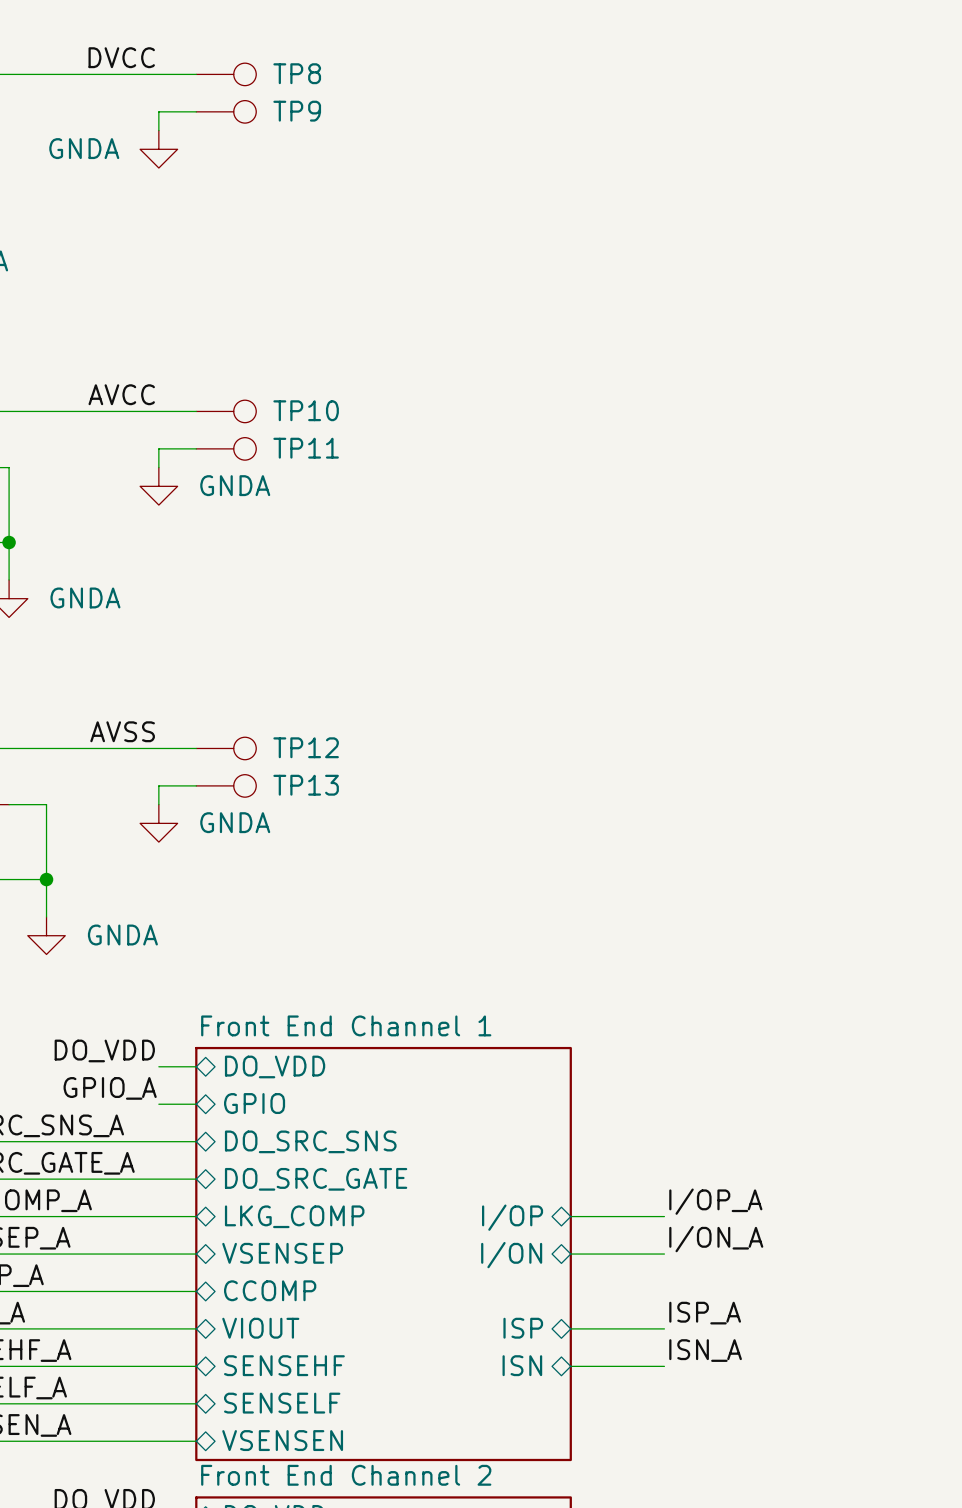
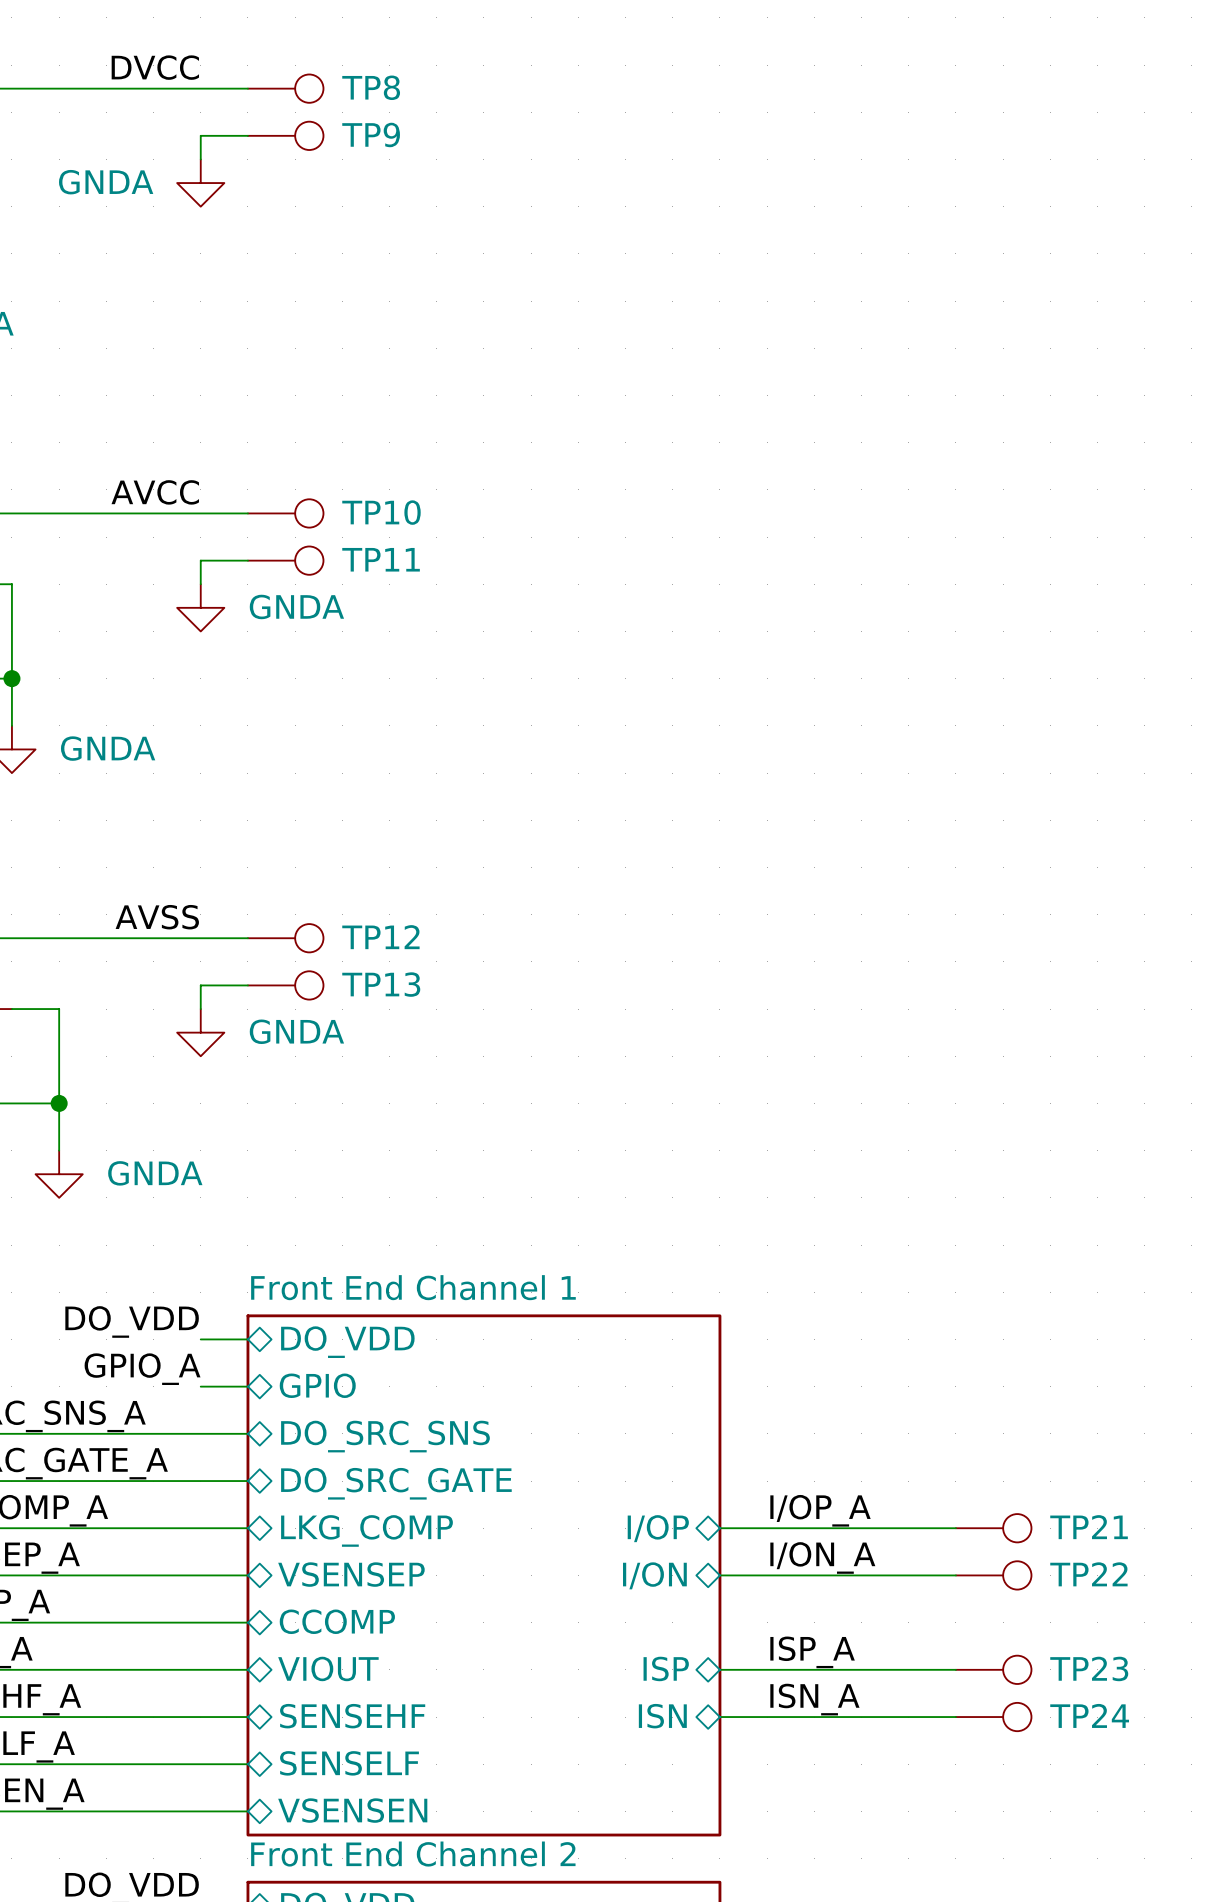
label position: I/OP_A (715, 1201) -> I/OP_A (820, 1510)
wire: none -> (837, 1528) (955, 1528)
TP21: none -> (993, 1528)
label position: I/ON_A (716, 1239) -> I/ON_A (822, 1557)
wire: none -> (837, 1575) (955, 1575)
TP22: none -> (993, 1575)
label position: ISP_A (705, 1313) -> ISP_A (812, 1652)
wire: none -> (837, 1669) (955, 1669)
TP23: none -> (993, 1669)
label position: ISN_A (705, 1350) -> ISN_A (814, 1699)
wire: none -> (837, 1717) (955, 1717)
TP24: none -> (993, 1717)

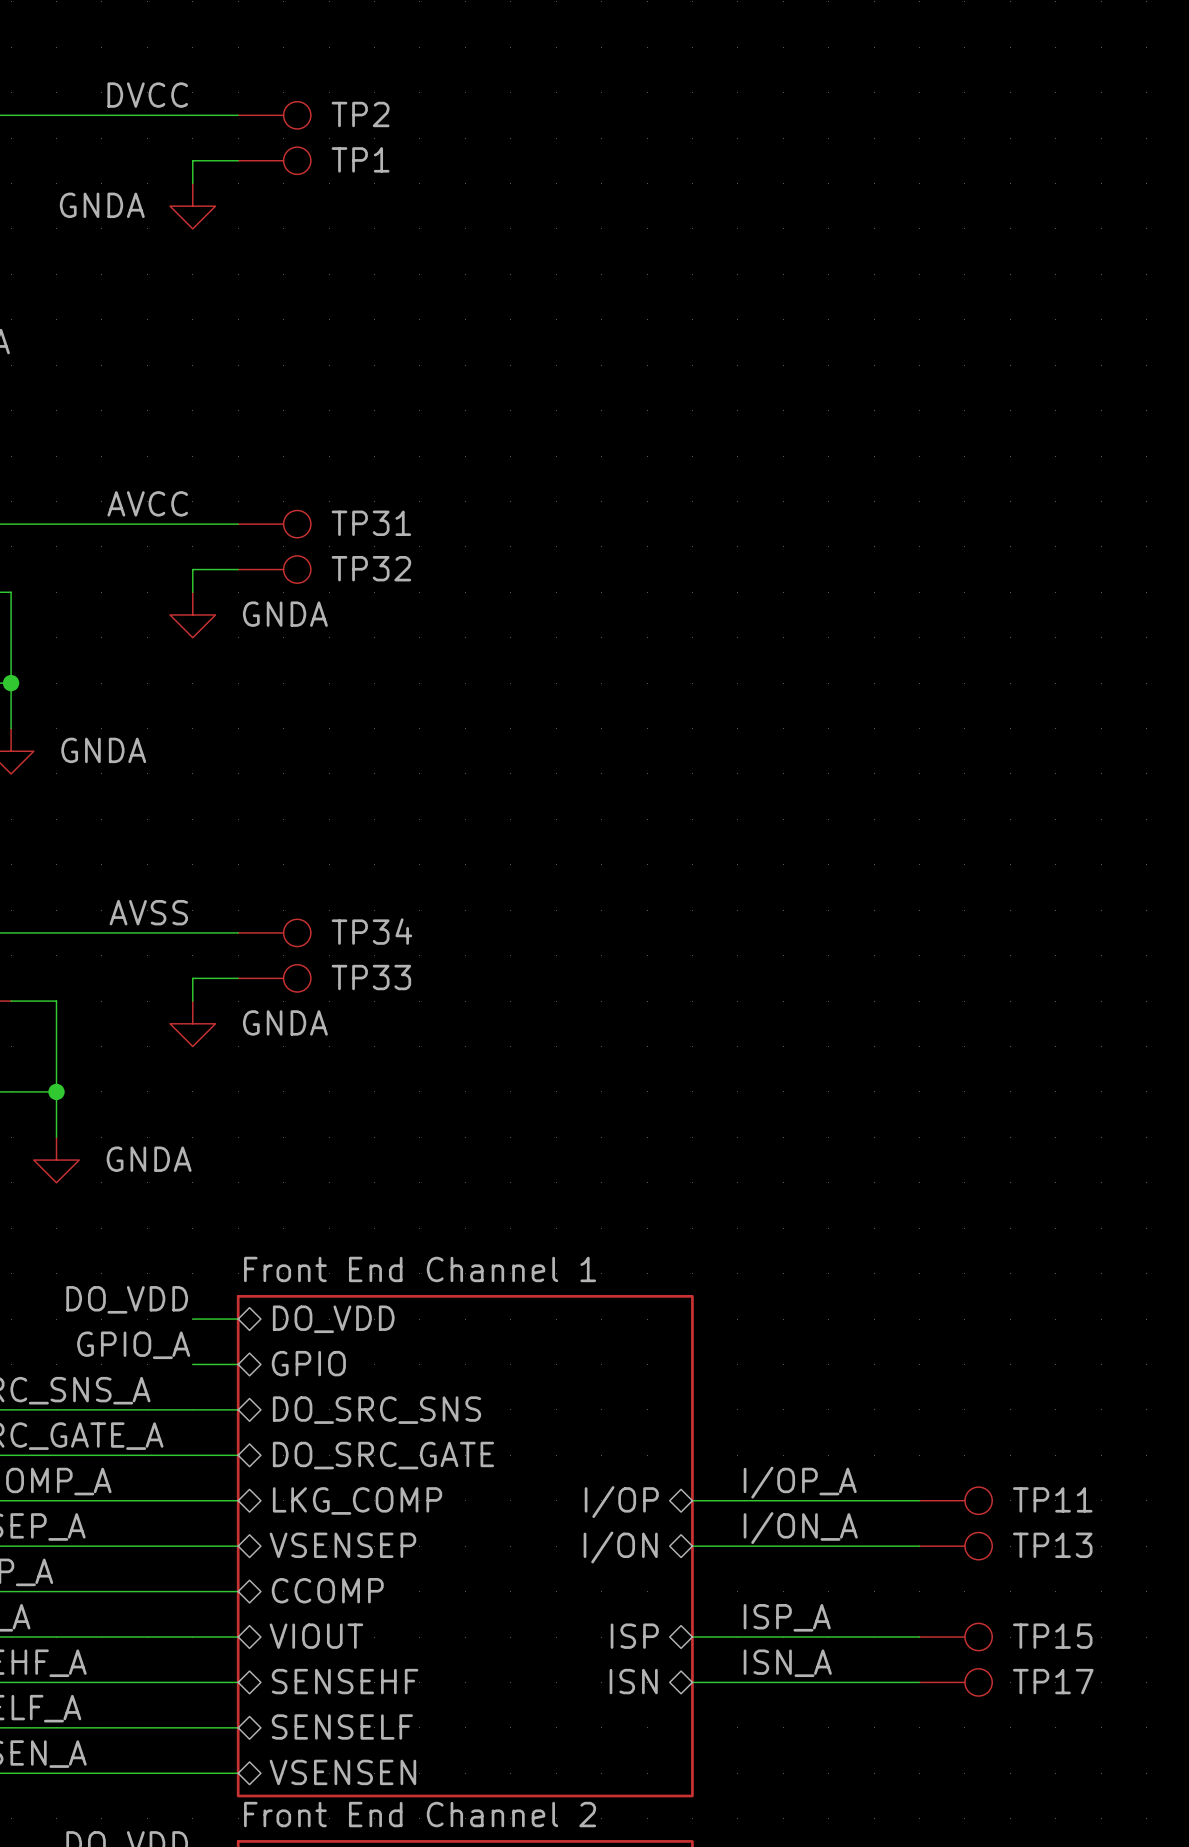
TP8 name: TP8 (371, 87) -> TP2 (360, 114)
TP9 name: TP9 (371, 134) -> TP1 (360, 159)
TP10 name: TP10 (381, 512) -> TP31 (371, 523)
TP11 name: TP11 (381, 559) -> TP32 (371, 568)
TP12 name: TP12 (380, 937) -> TP34 (371, 931)
TP13 name: TP13 (381, 984) -> TP33 (371, 977)
TP21 name: TP21 (1089, 1527) -> TP11 (1052, 1499)
TP22 name: TP22 (1088, 1574) -> TP13 (1052, 1545)
TP23 name: TP23 (1089, 1668) -> TP15 (1052, 1636)
TP24 name: TP24 (1089, 1715) -> TP17 (1053, 1681)

